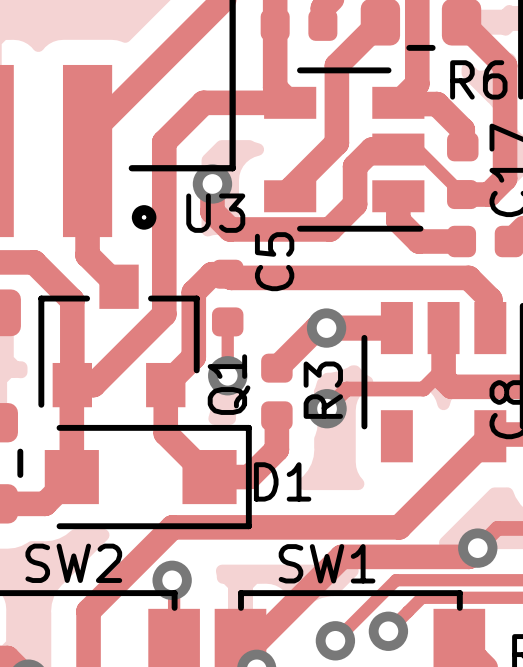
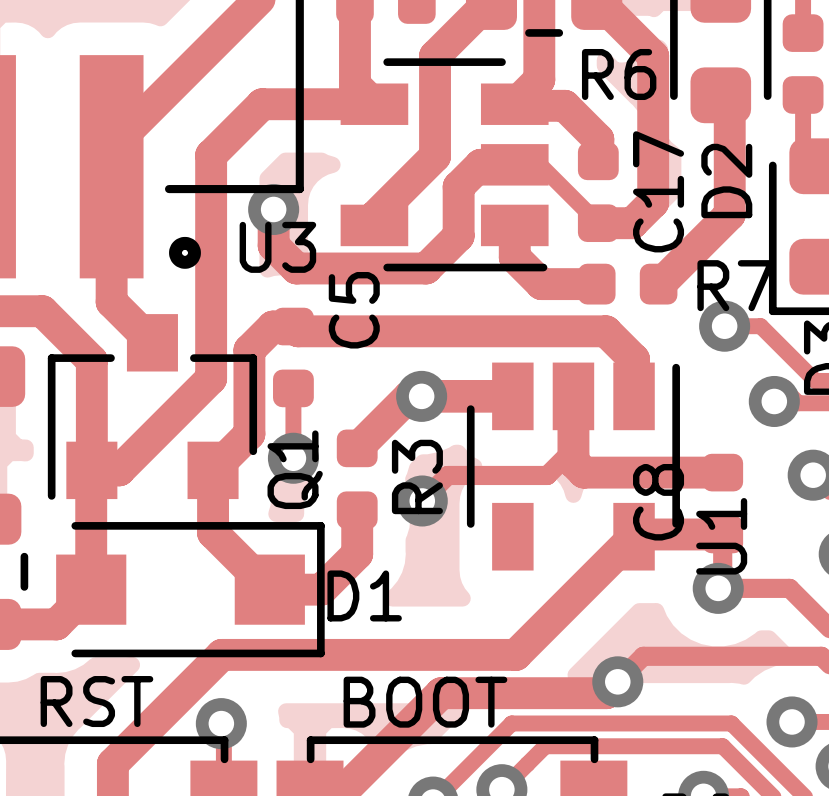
SW2 name: SW2 (73, 563) -> RST (96, 701)
SW1 name: SW1 (327, 563) -> BOOT (425, 702)

